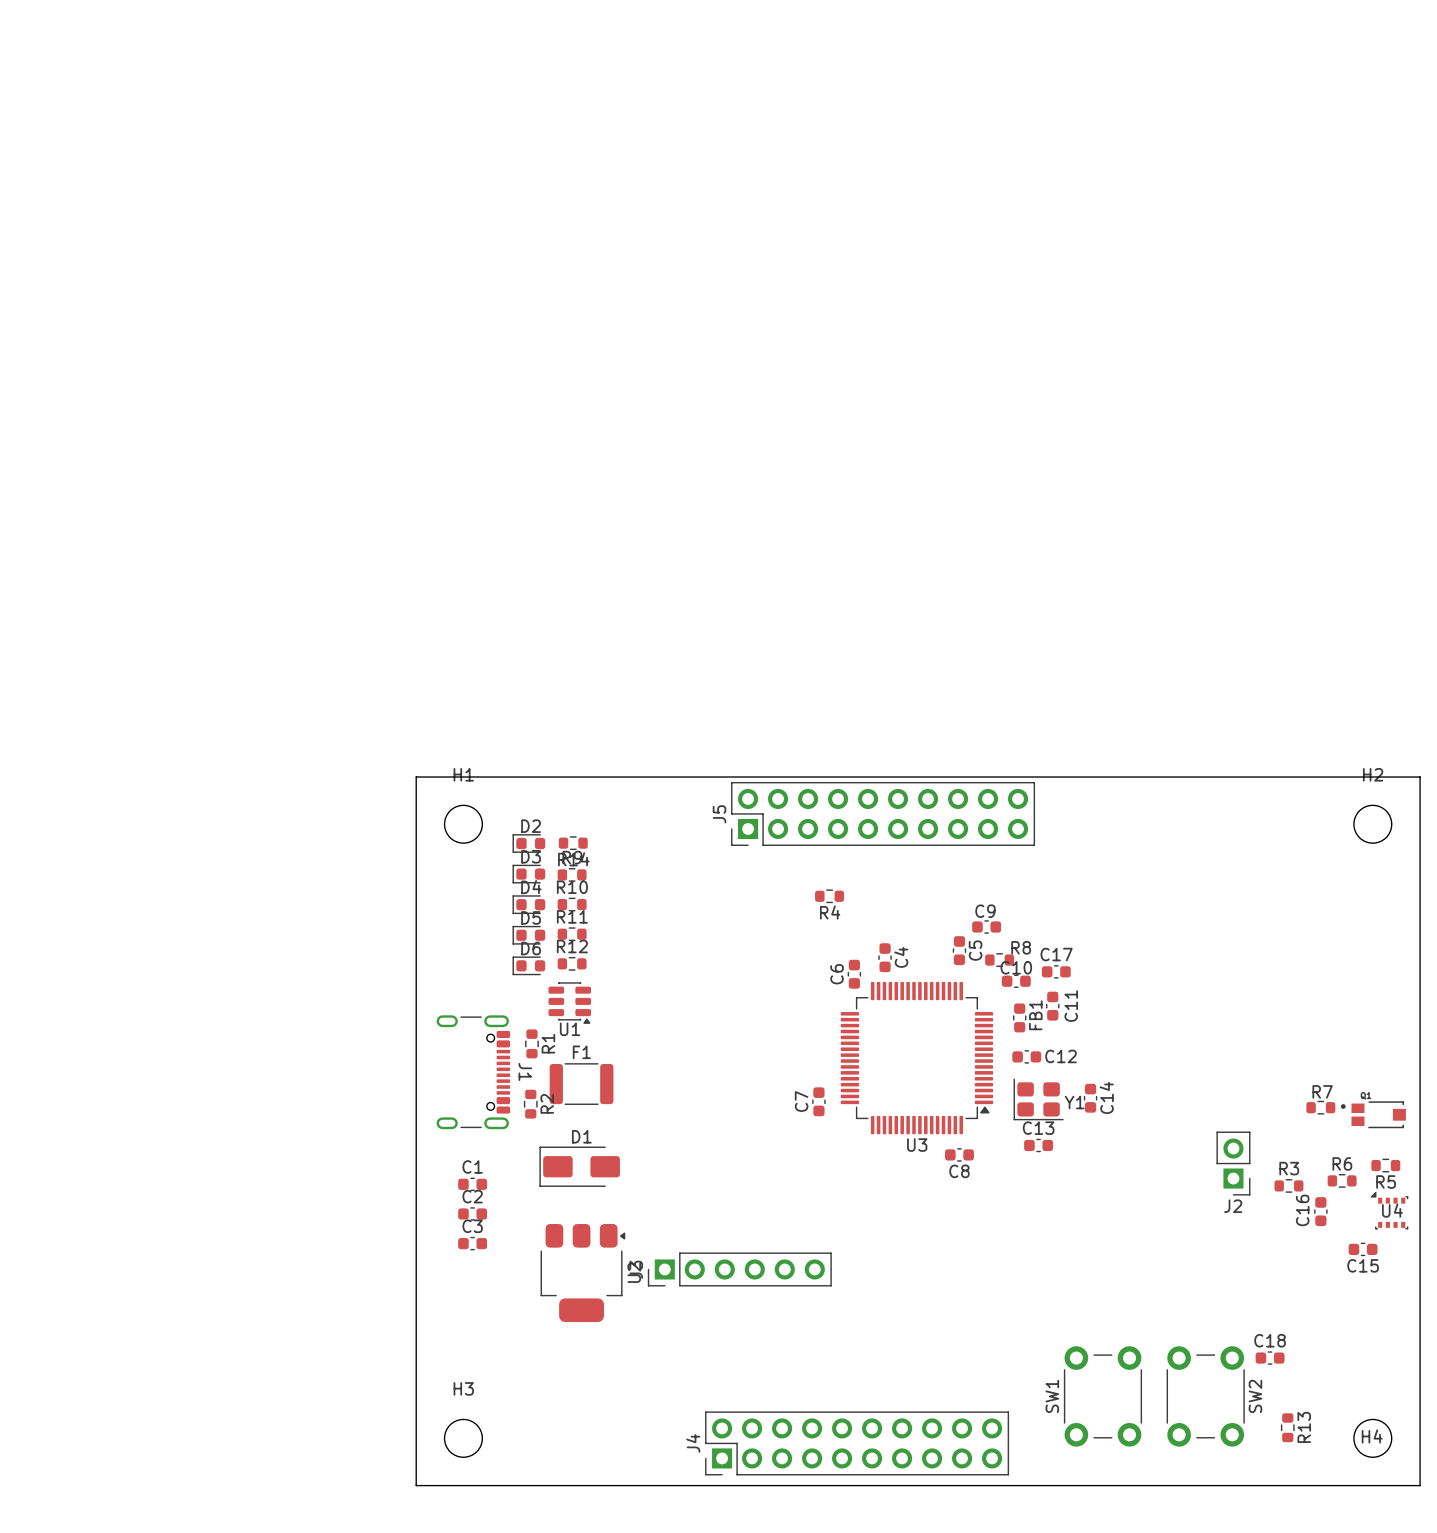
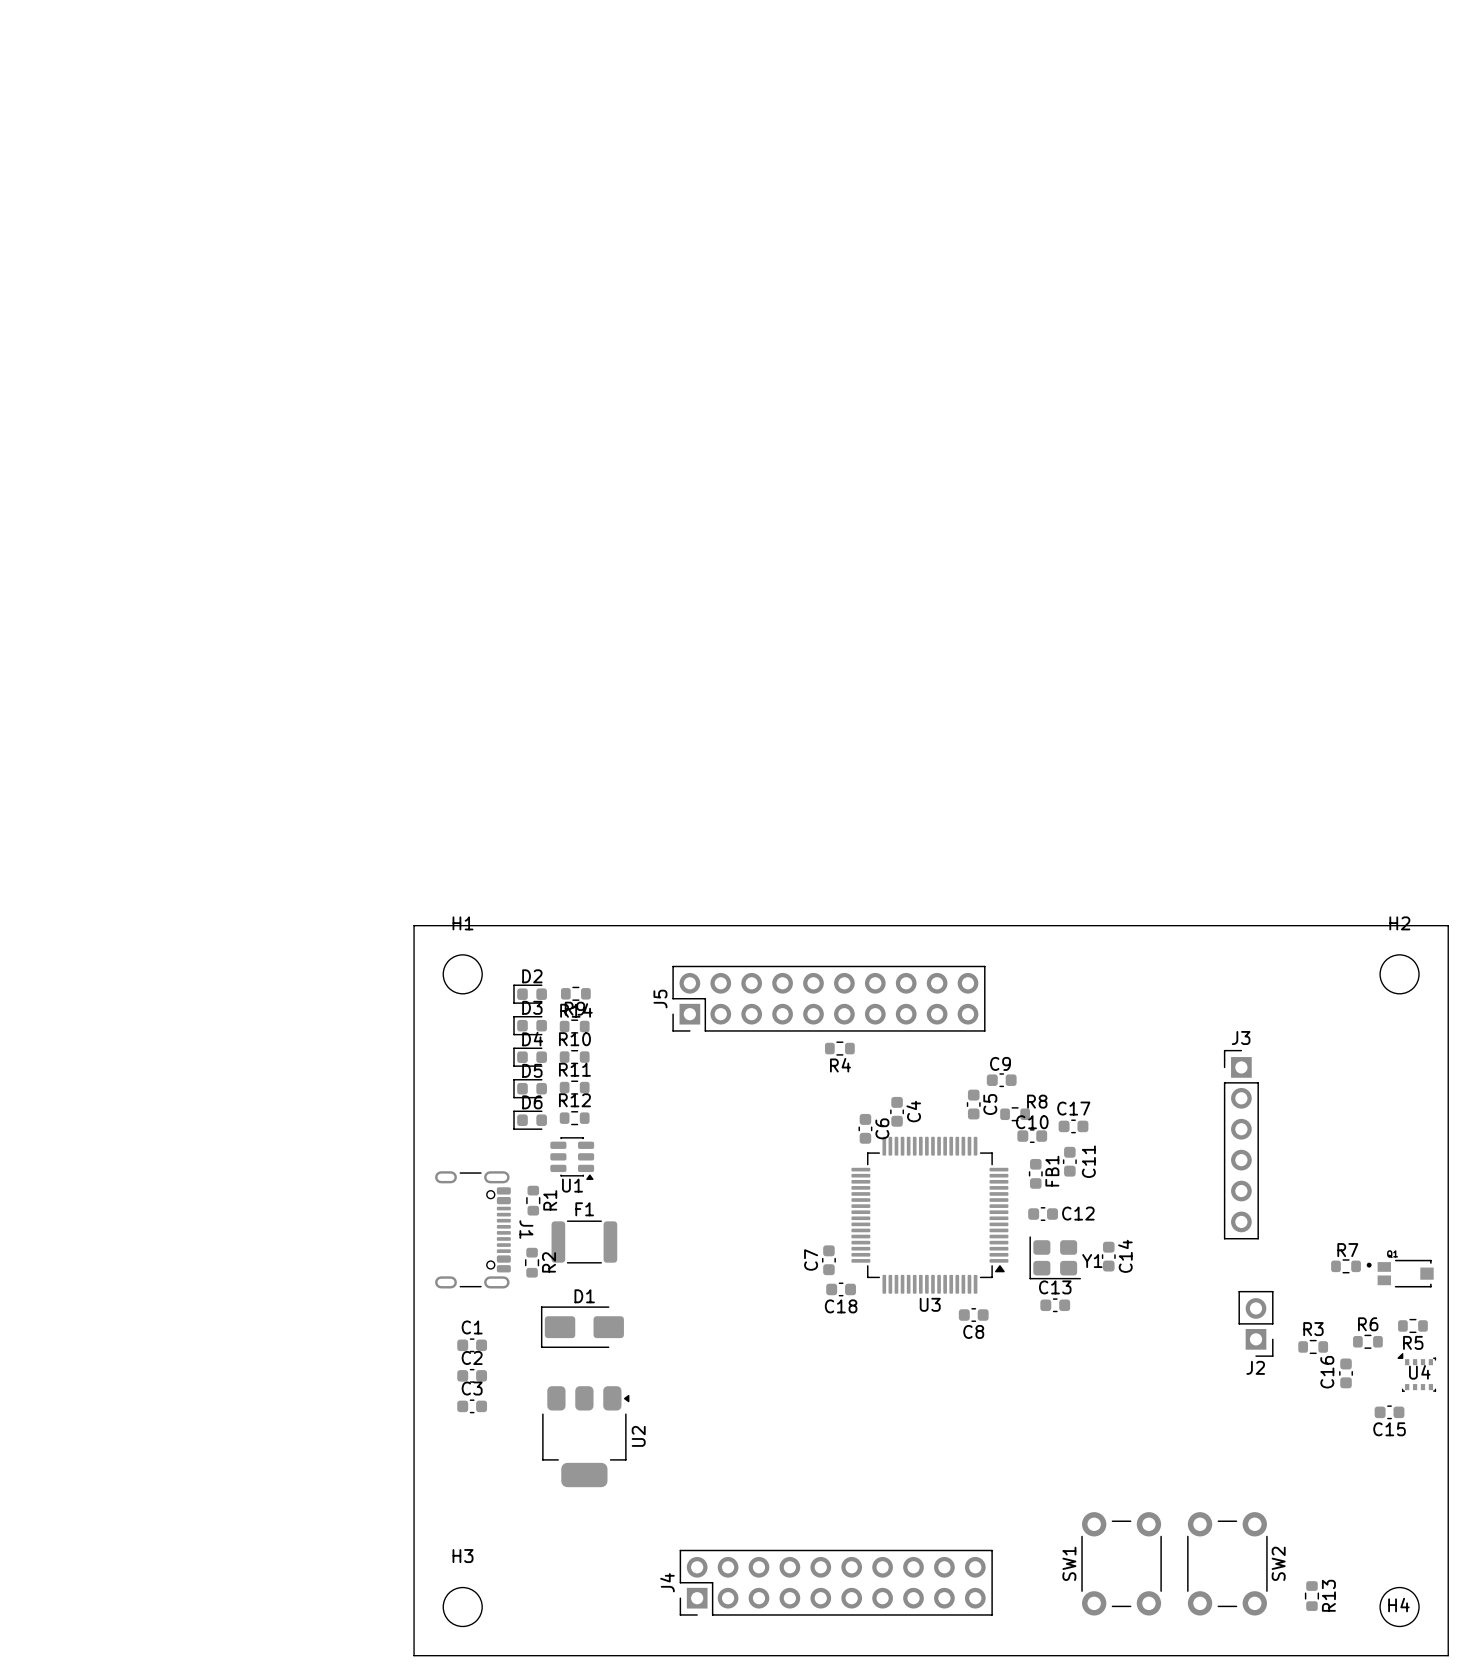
J5 position: (883, 813) -> (828, 998)
C6 name position: C6 (837, 974) -> C6 (882, 1128)
J3 rotation: 0° (739, 1269) -> 90° clockwise (1241, 1144)
J3 position: (739, 1269) -> (1241, 1144)
C18 name position: C18 (1270, 1340) -> C18 (841, 1306)
C18 position: (1270, 1358) -> (841, 1289)
J4 position: (857, 1443) -> (836, 1582)

